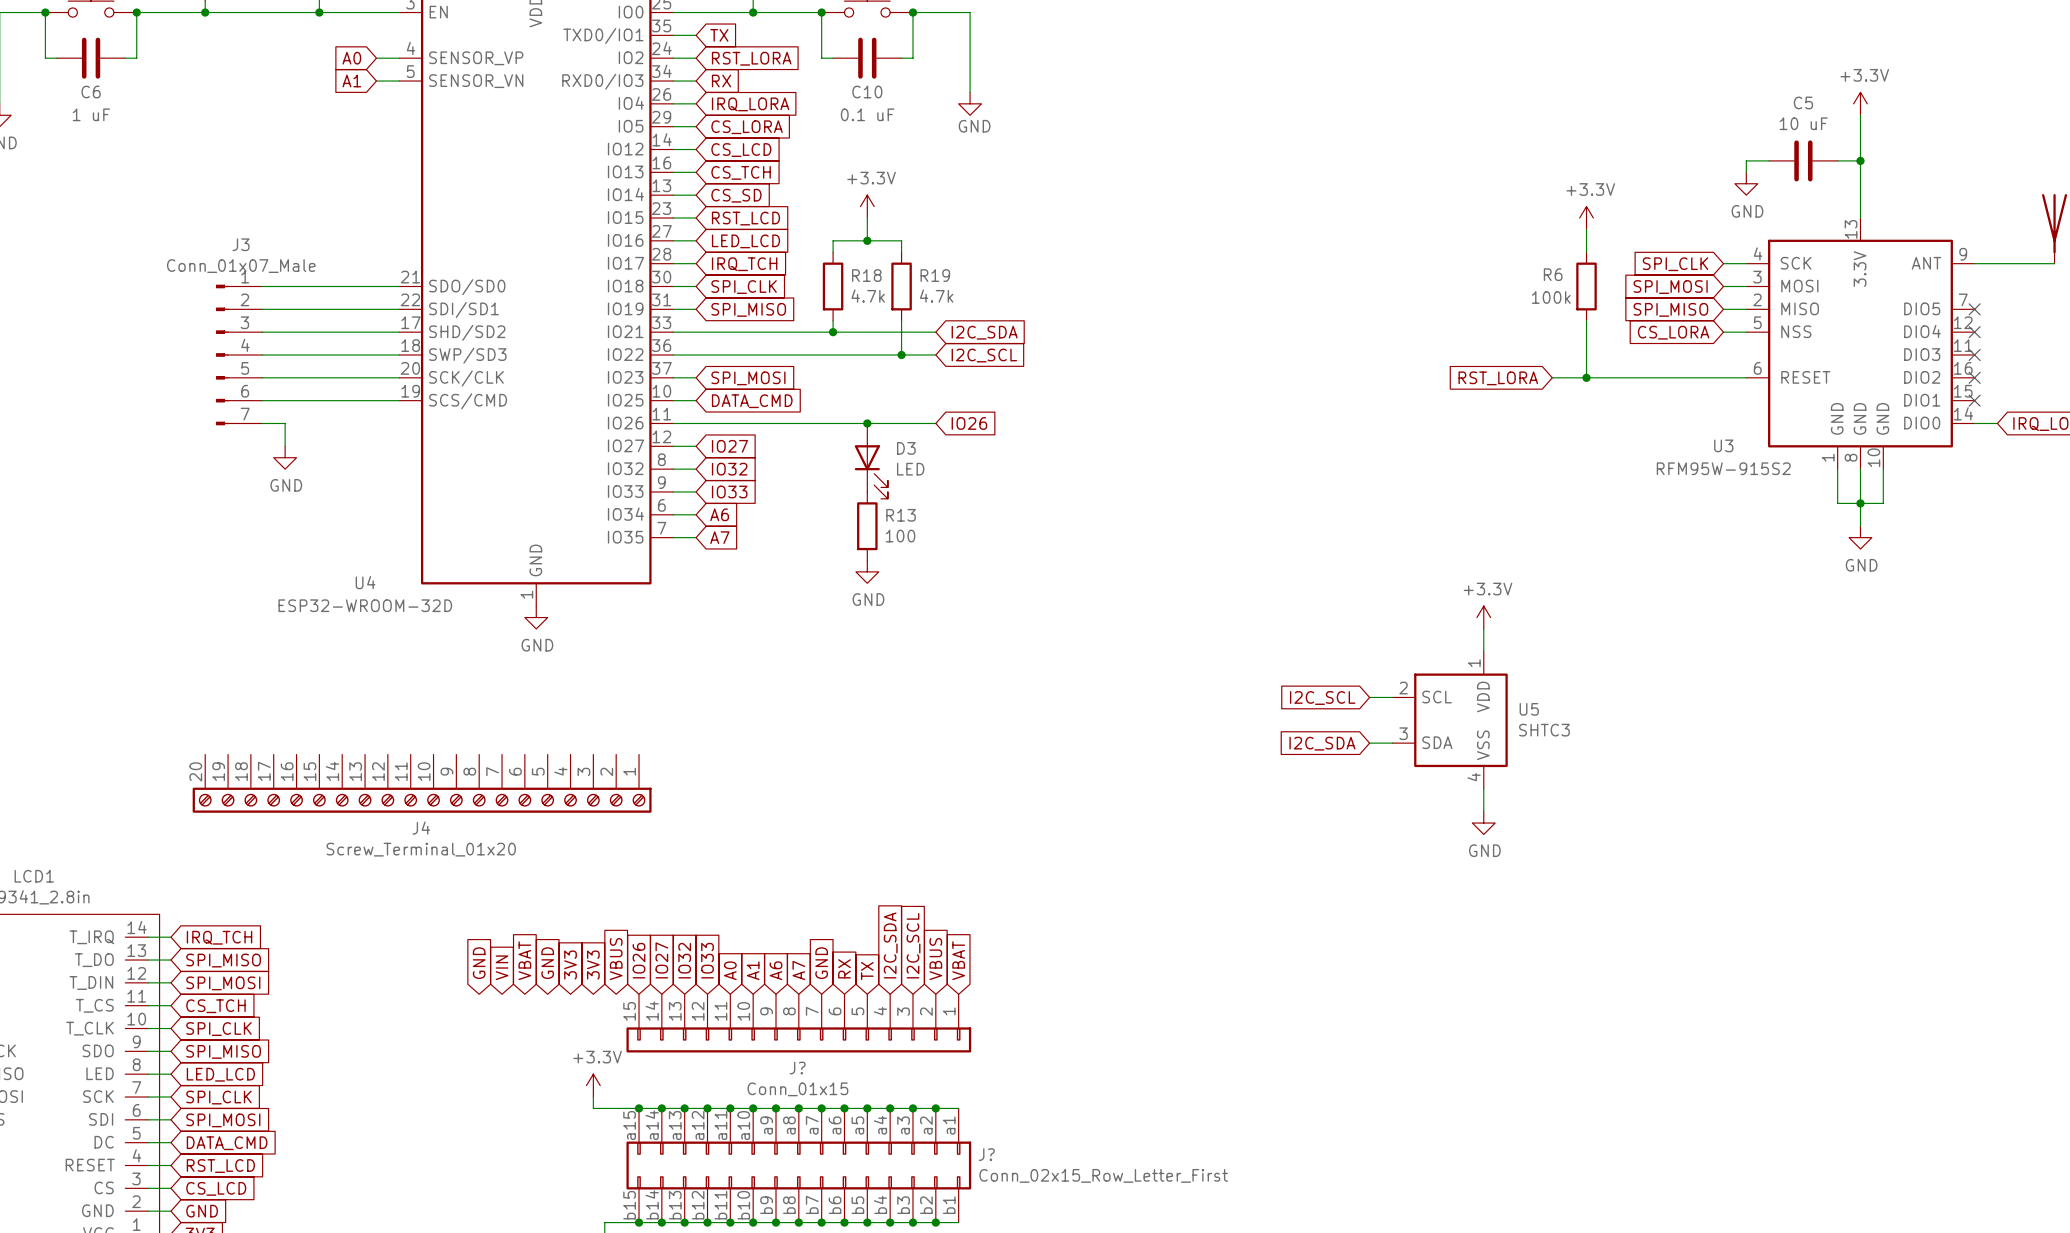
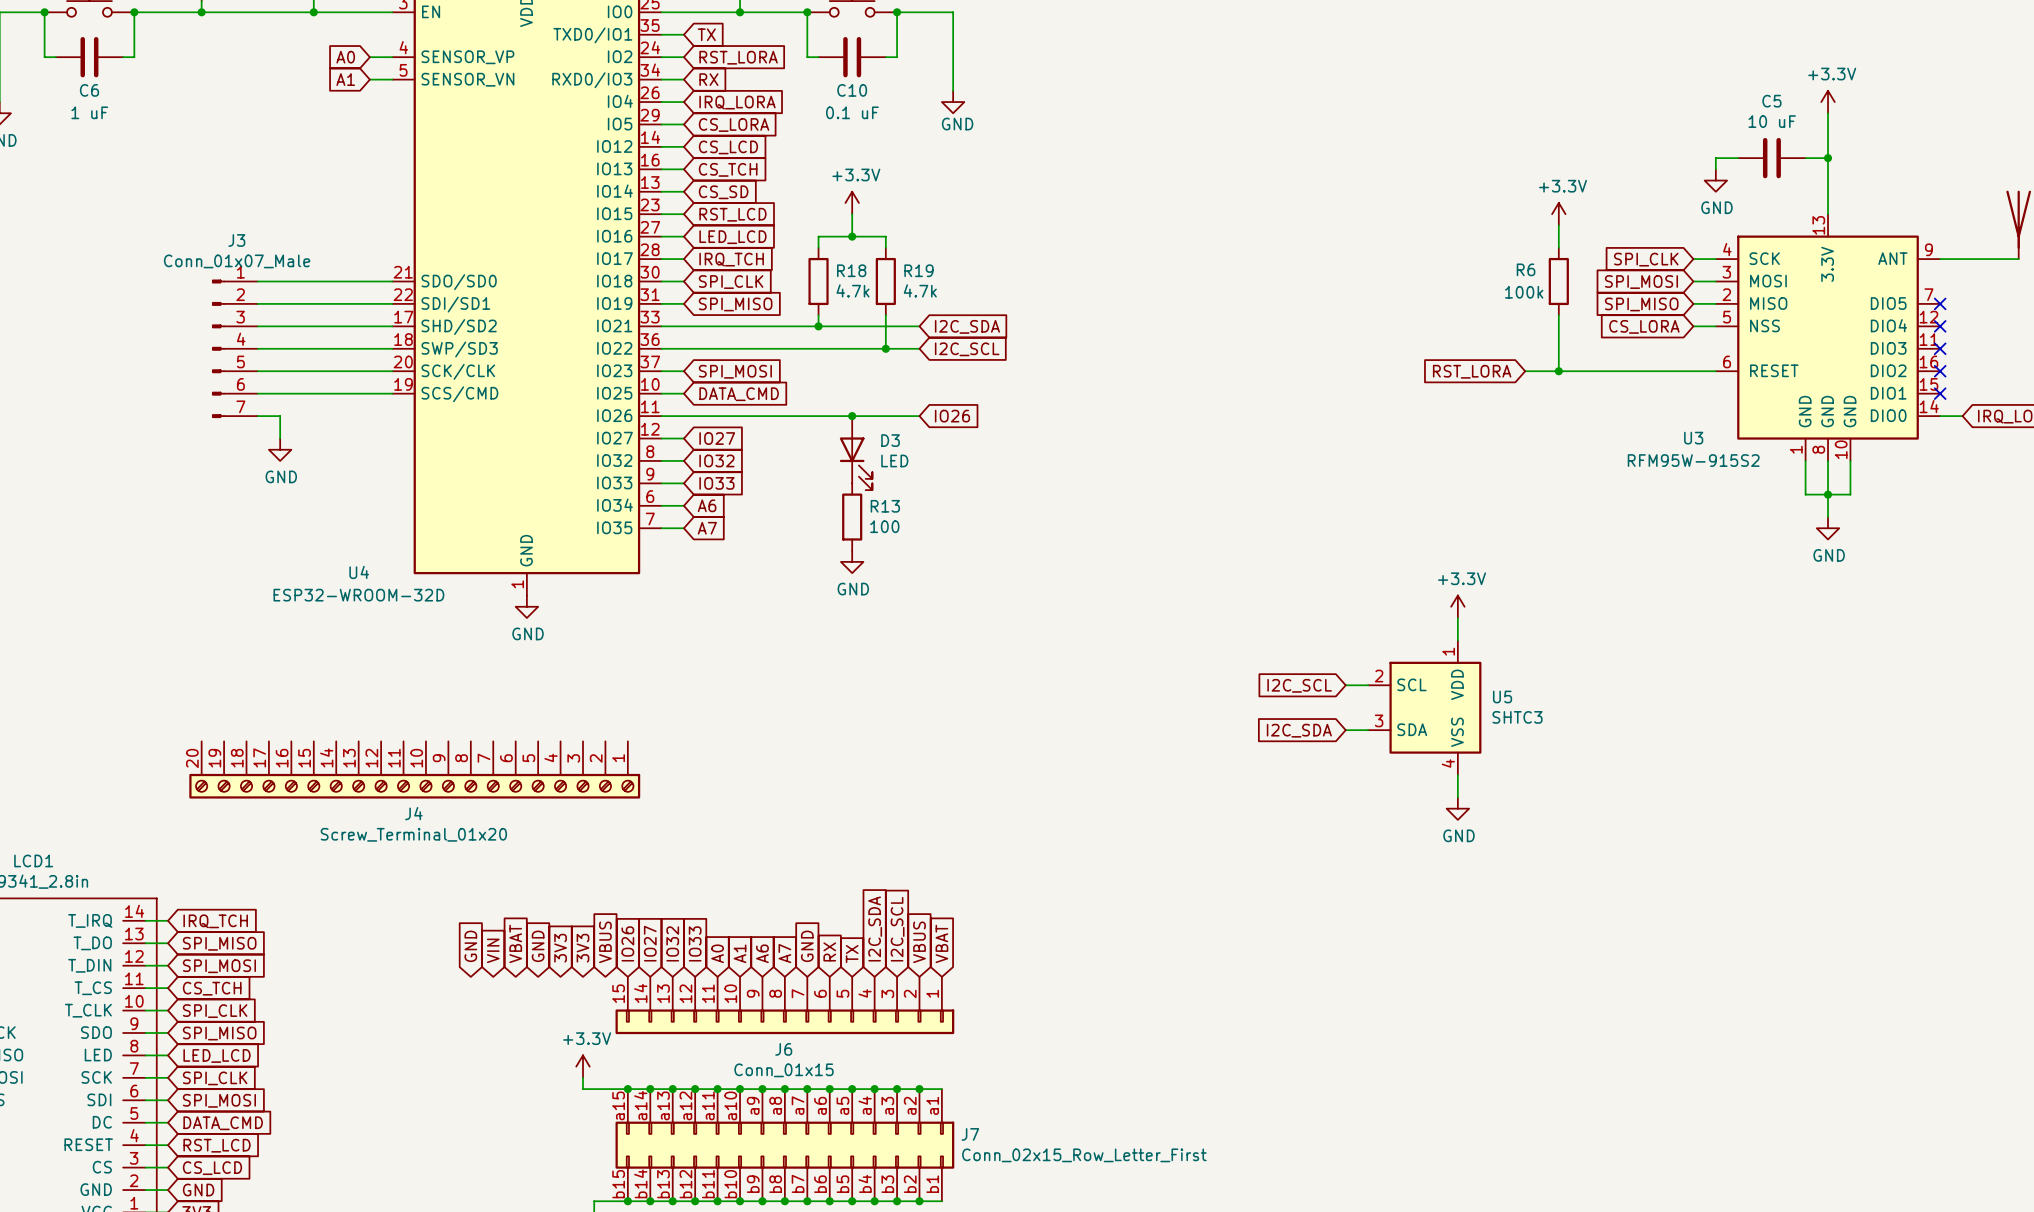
J? name: J? (797, 1068) -> J6 (783, 1049)
J? name: J? (986, 1154) -> J7 (970, 1134)

